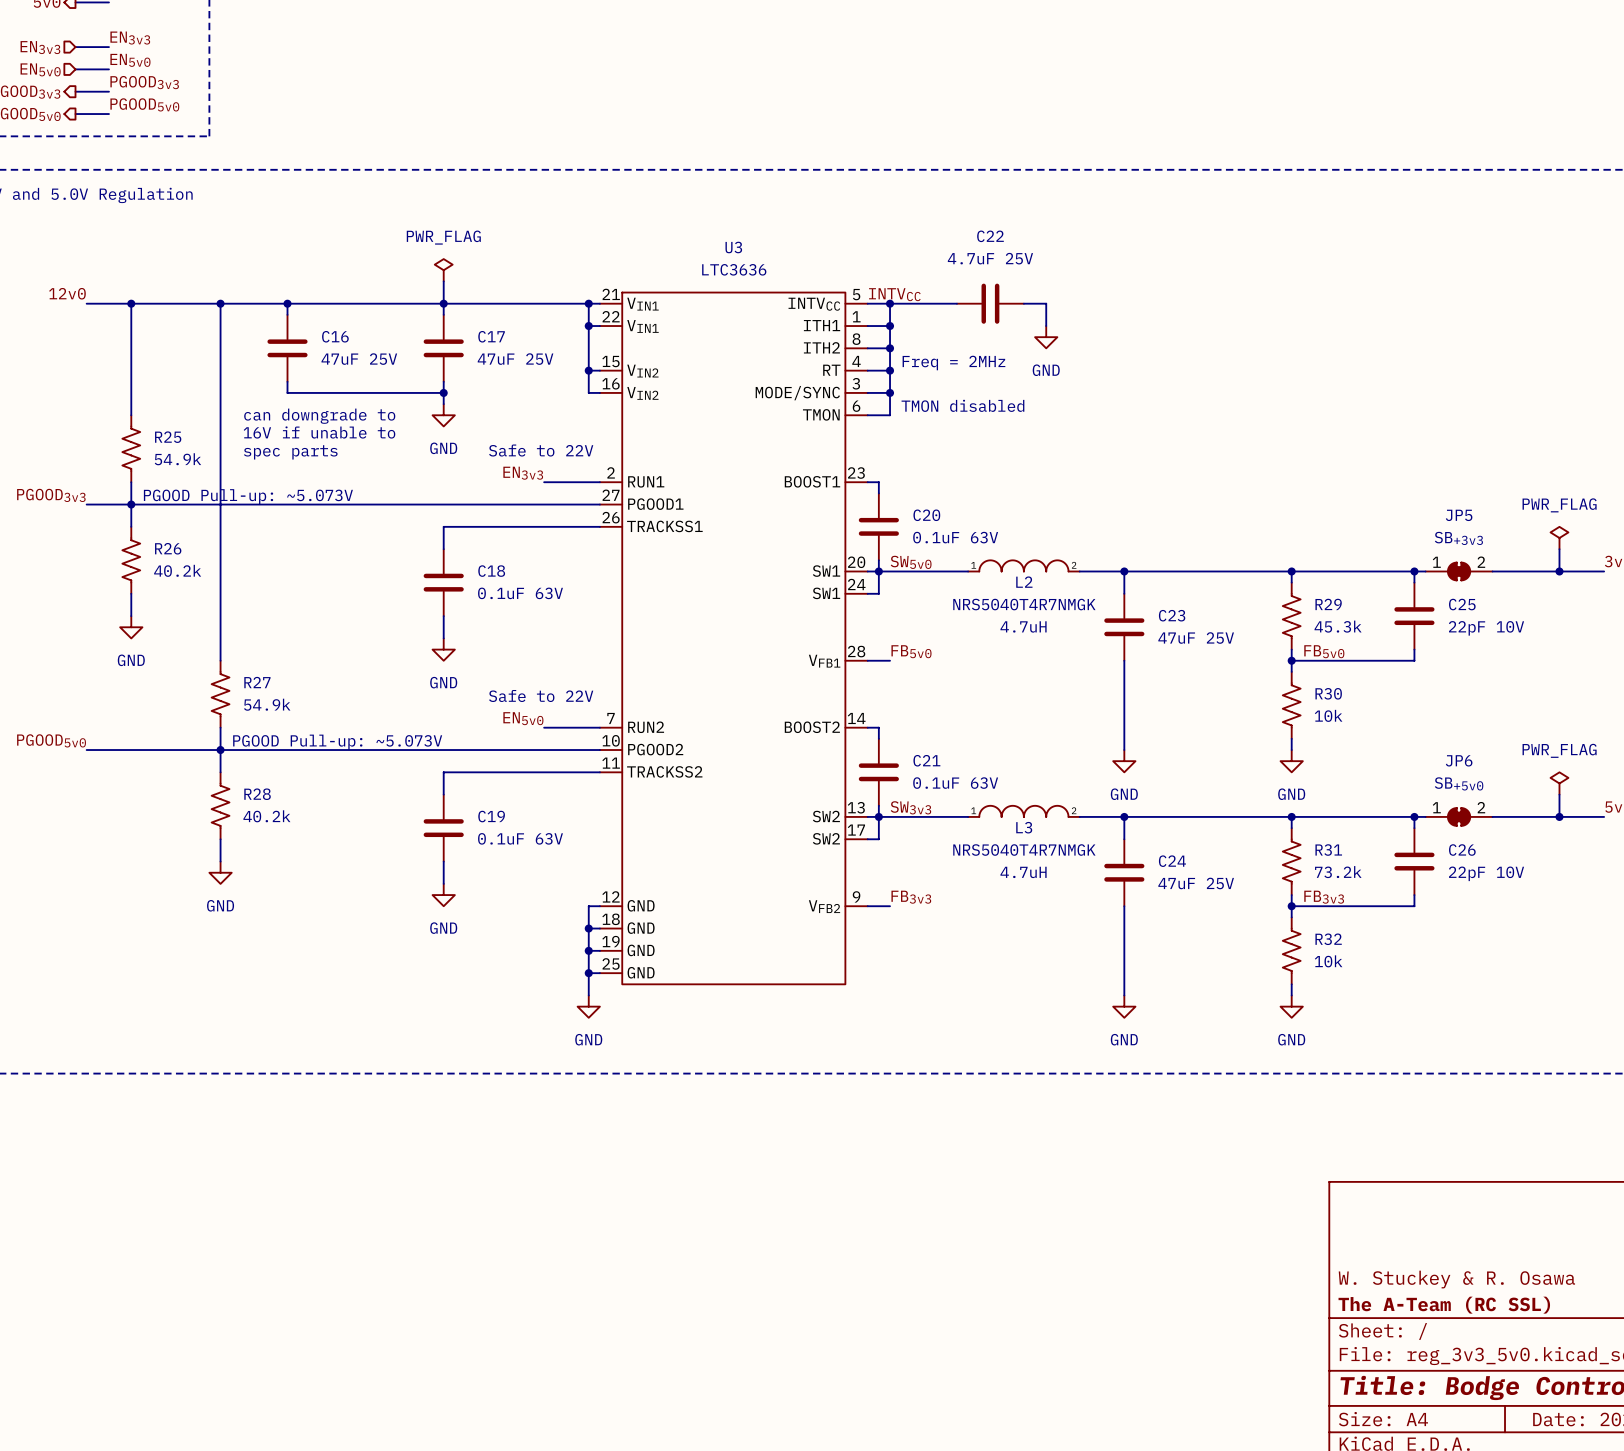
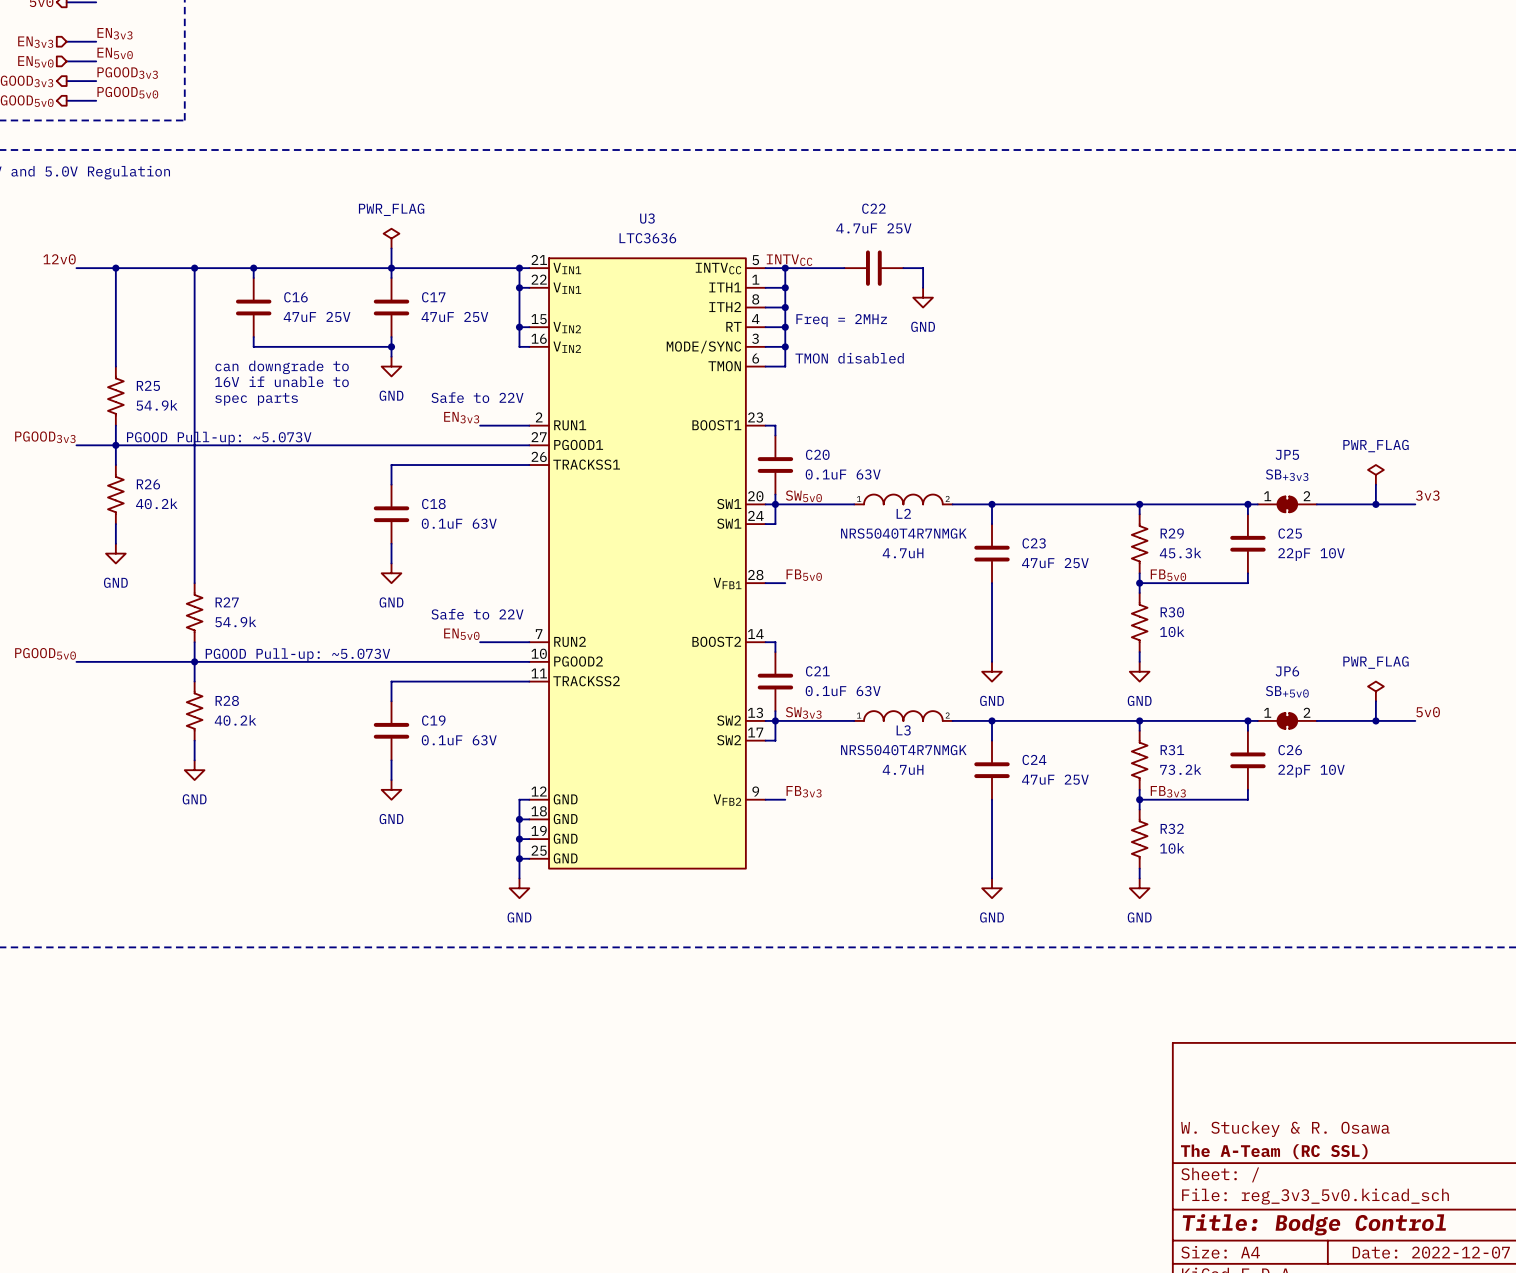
U3 symbol: [599, 291, 868, 985] -> [529, 257, 766, 870]

